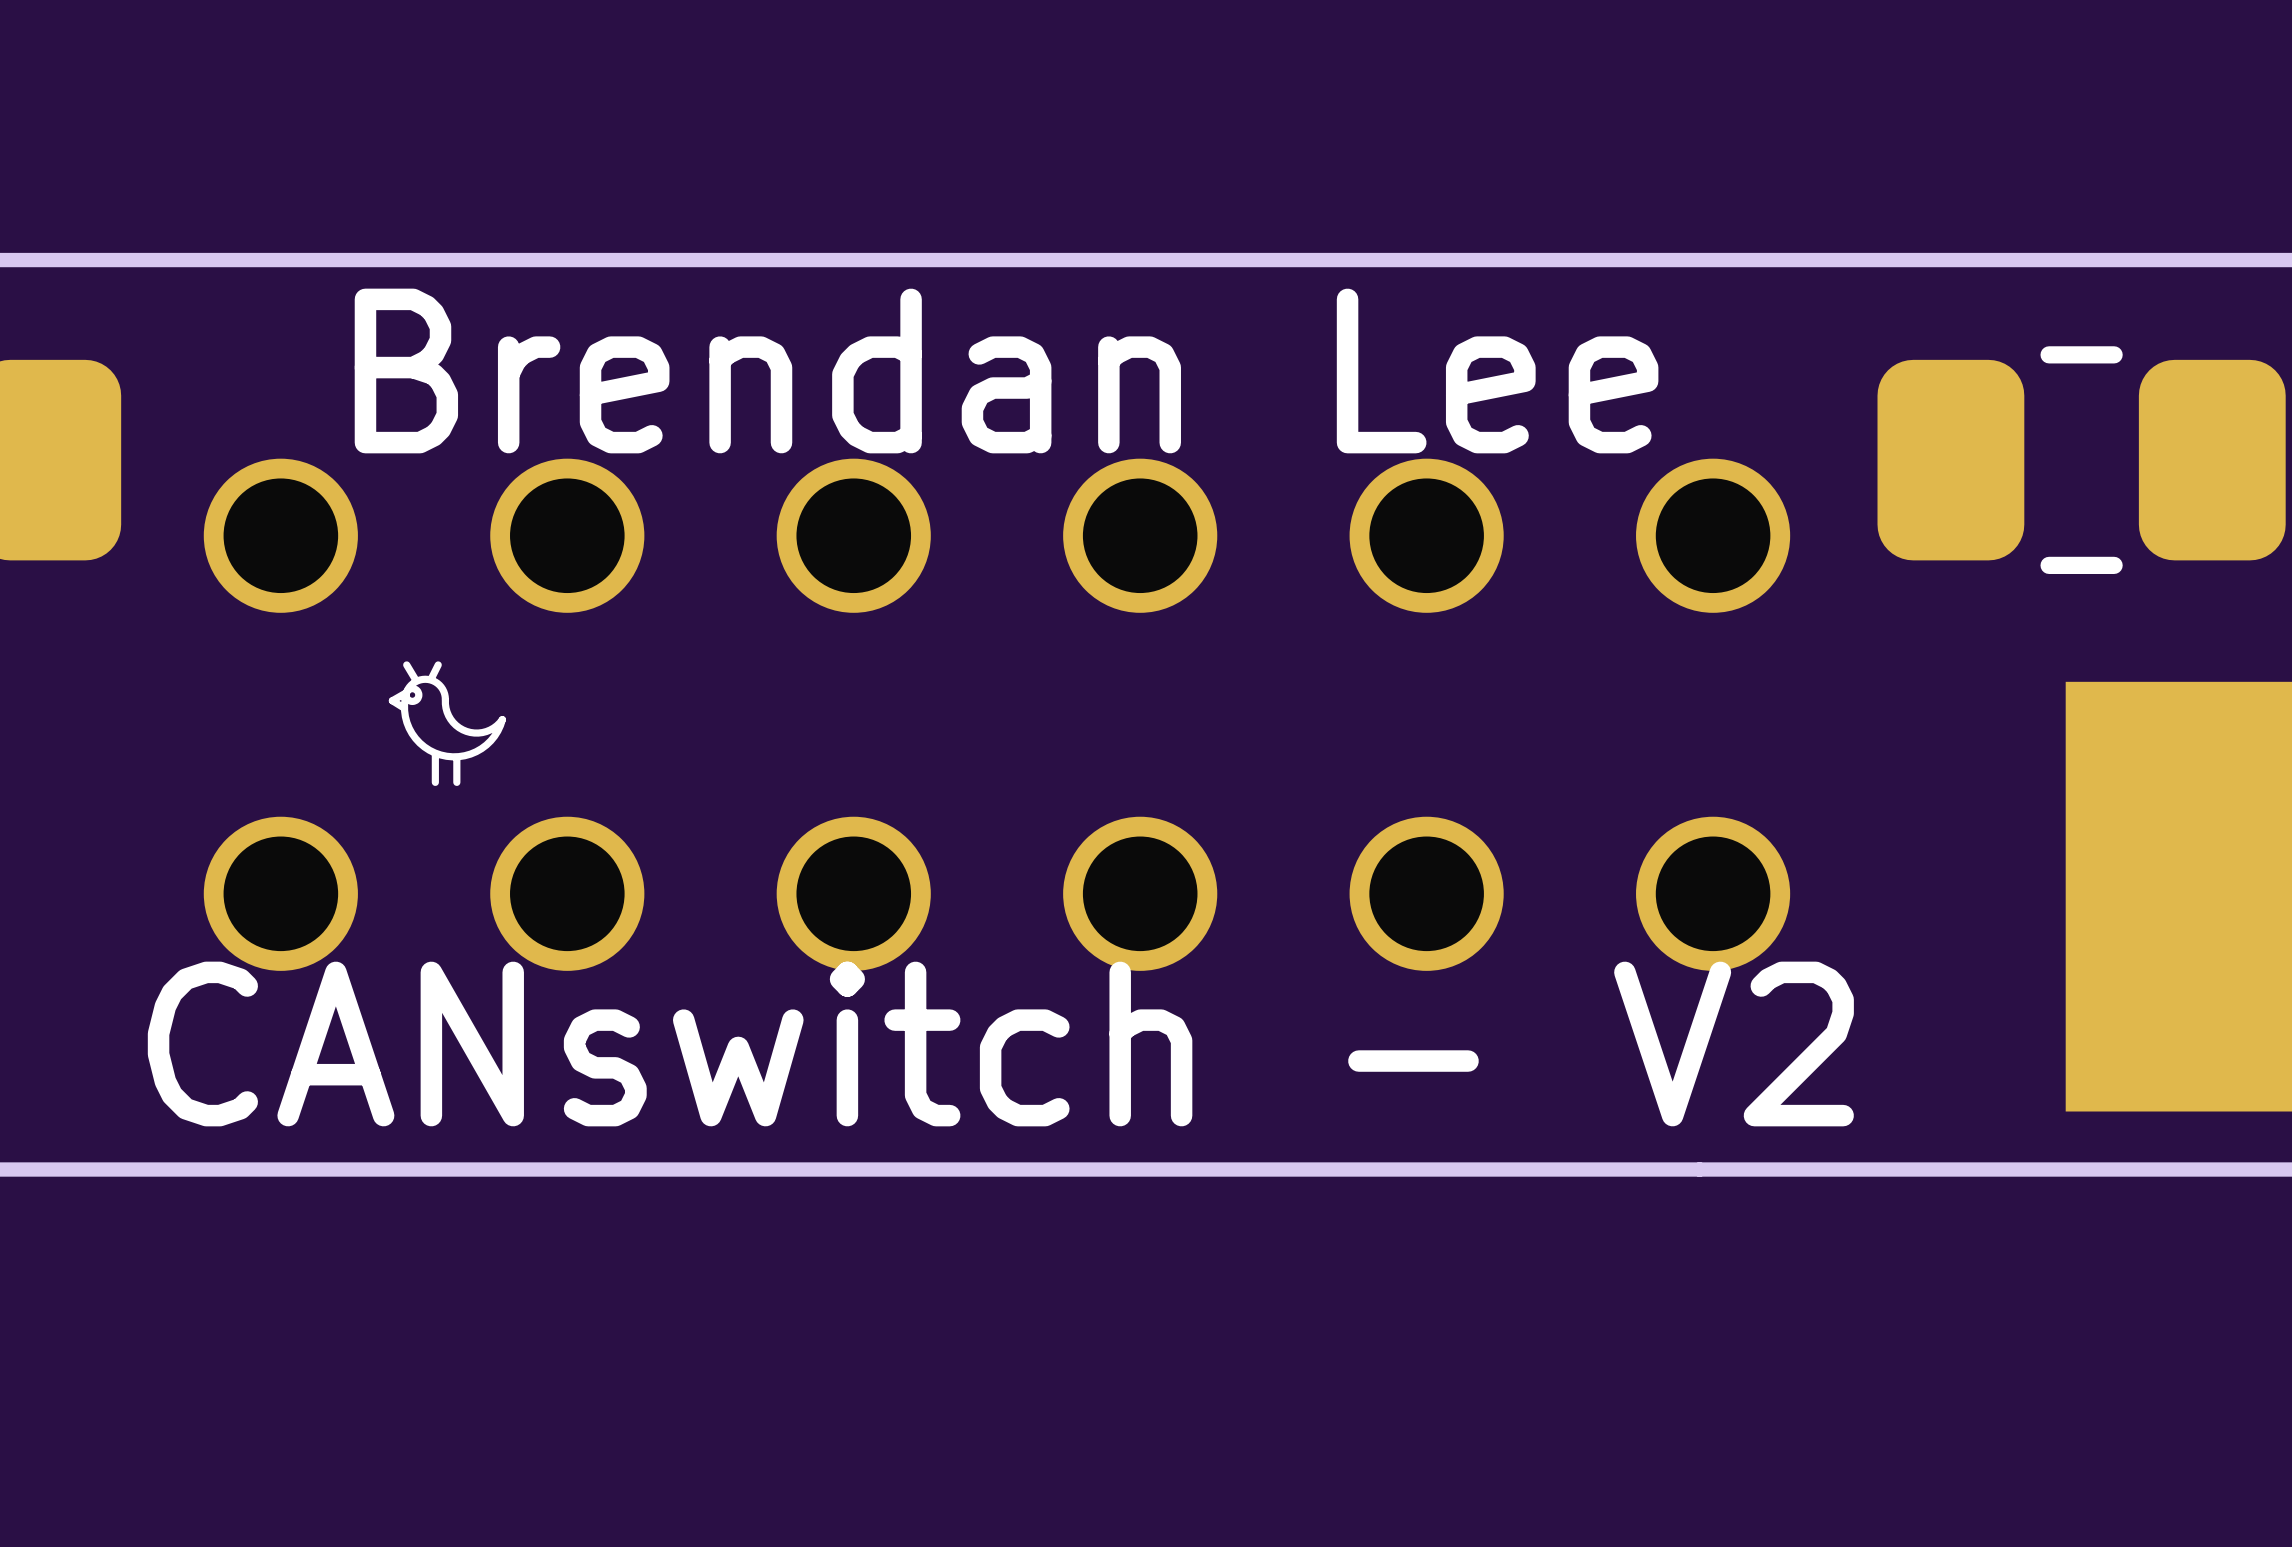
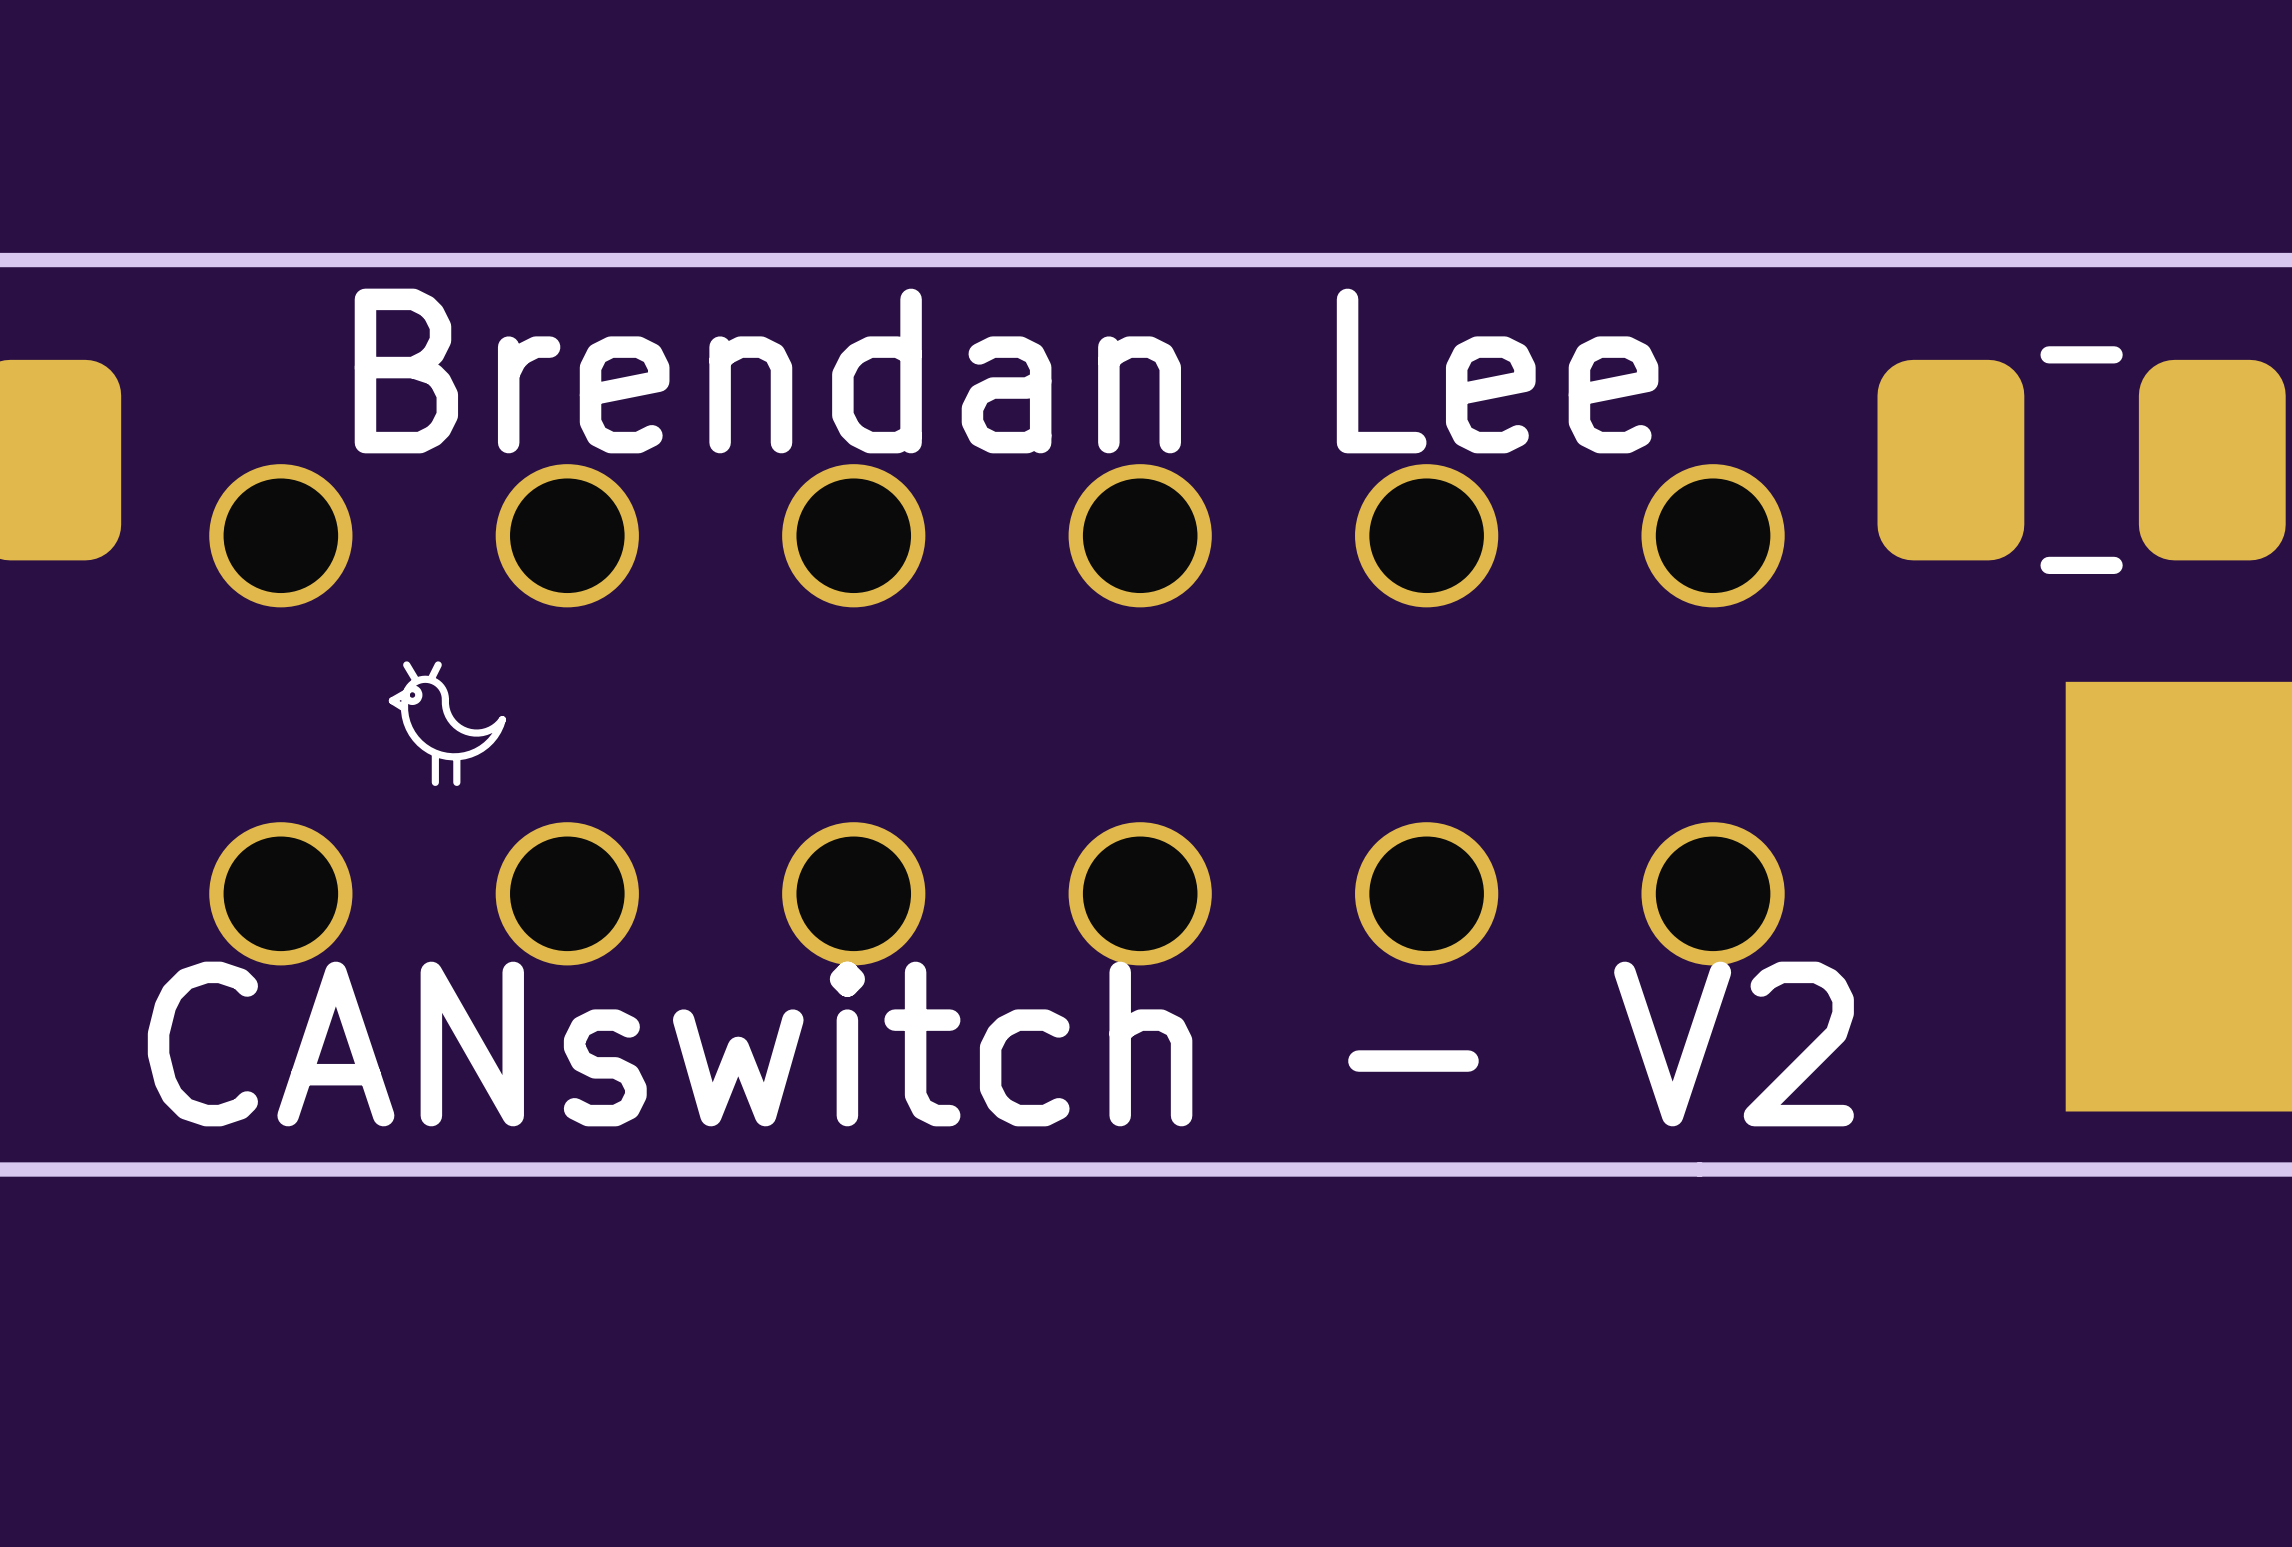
part footprint: [203, 458, 1791, 971] -> [209, 464, 1785, 966]

